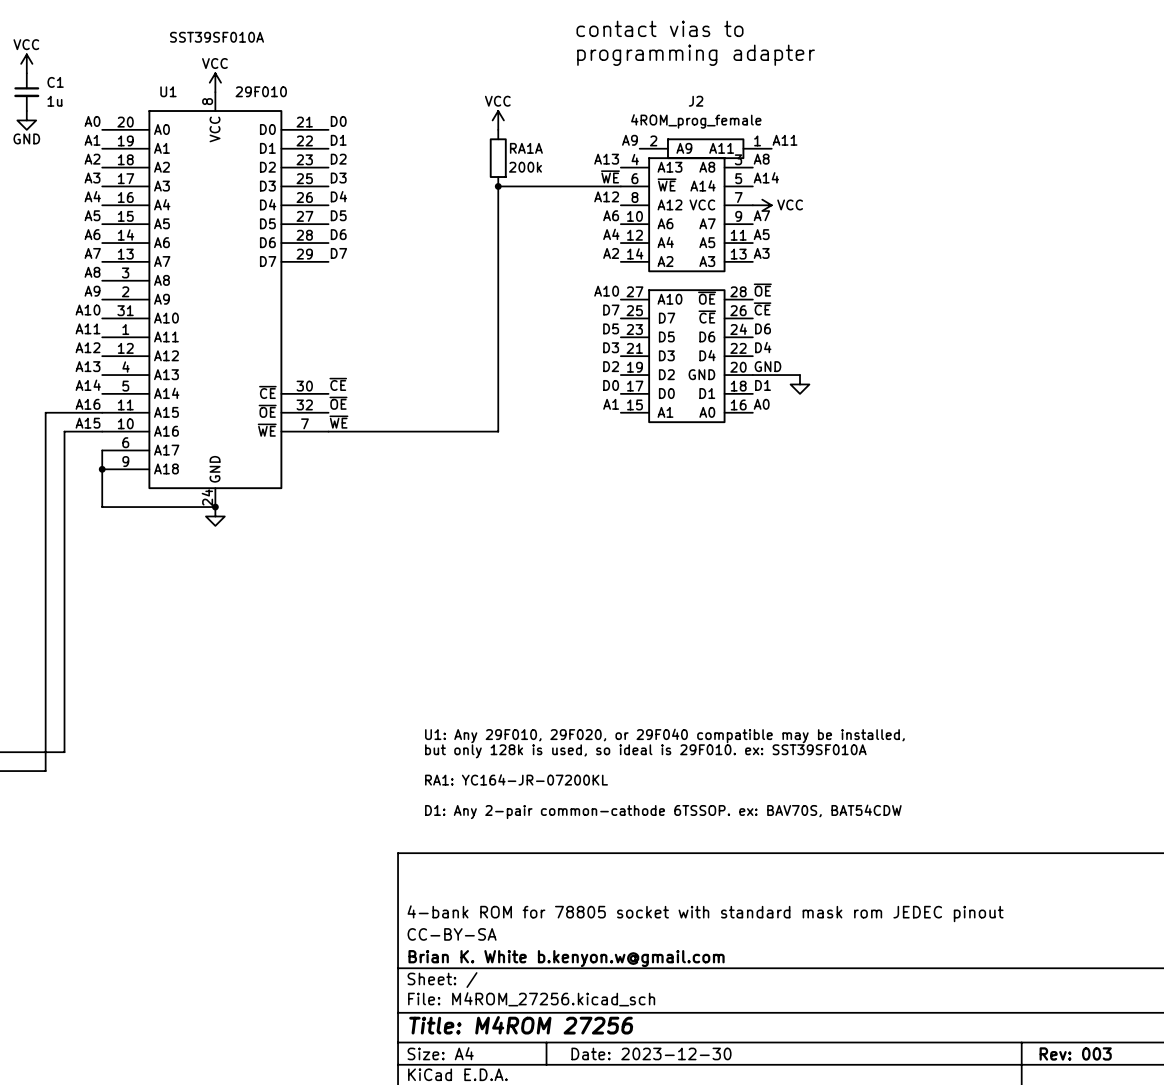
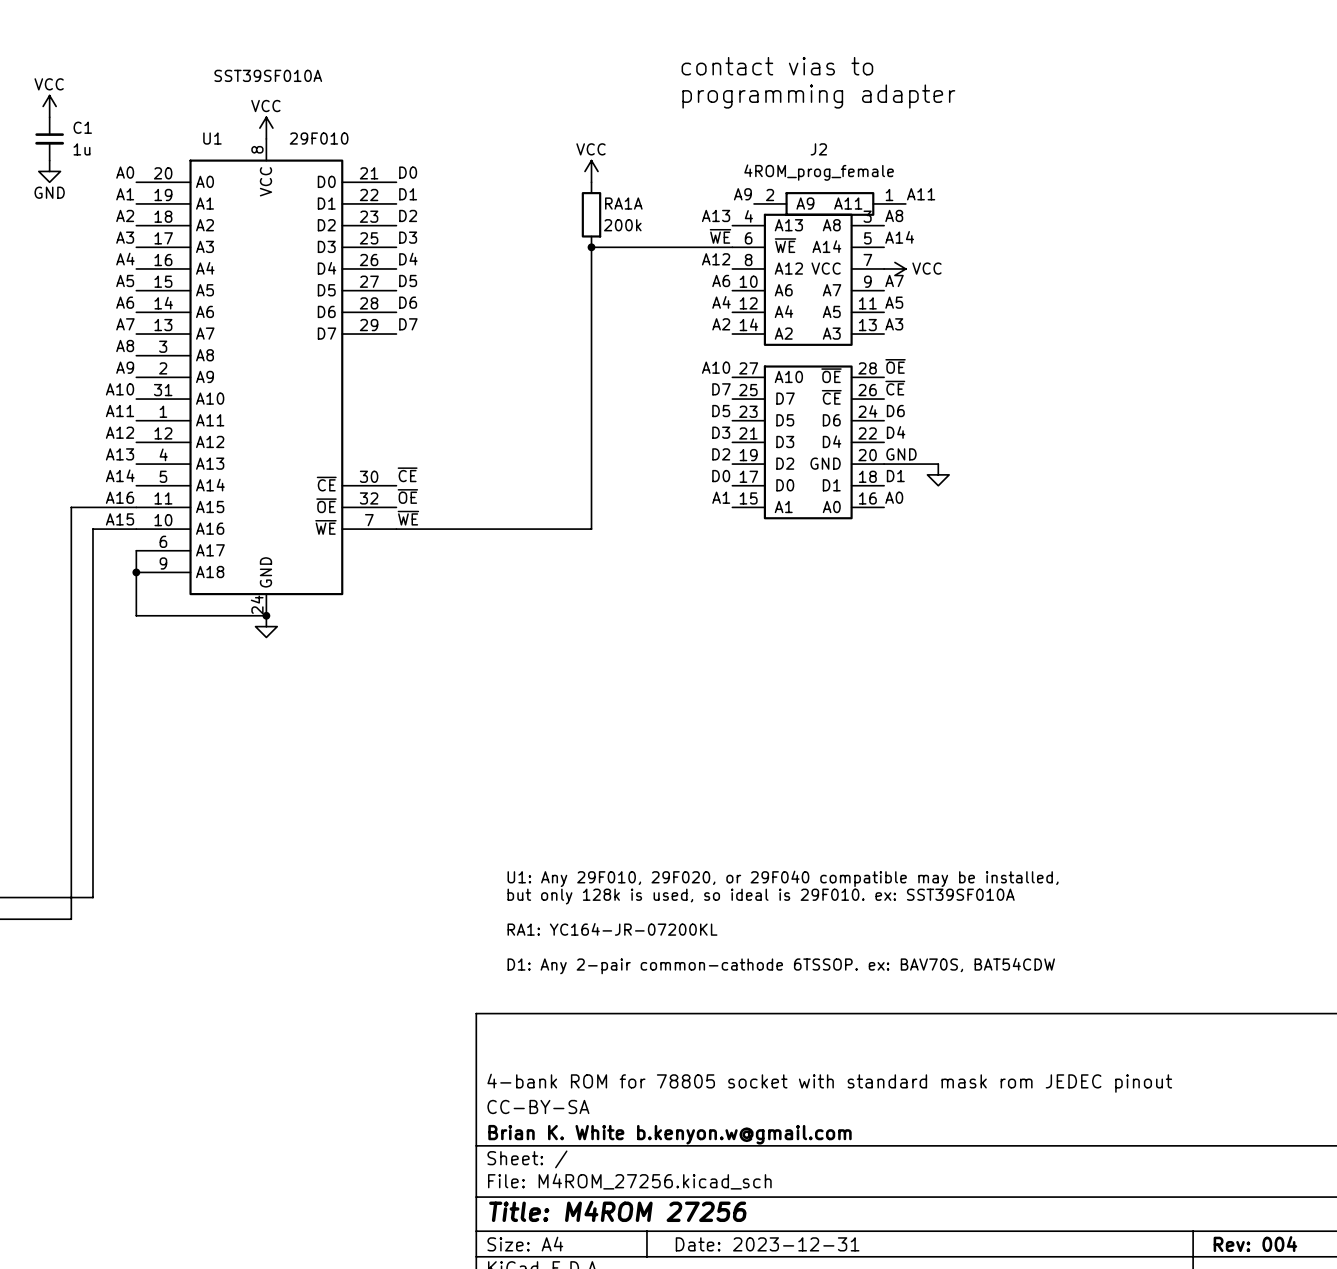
title block: Date: 2023-12-30 (651, 1053) -> Date: 2023-12-31 (767, 1244)
title block: Rev: 003 (1075, 1053) -> Rev: 004 (1255, 1244)

